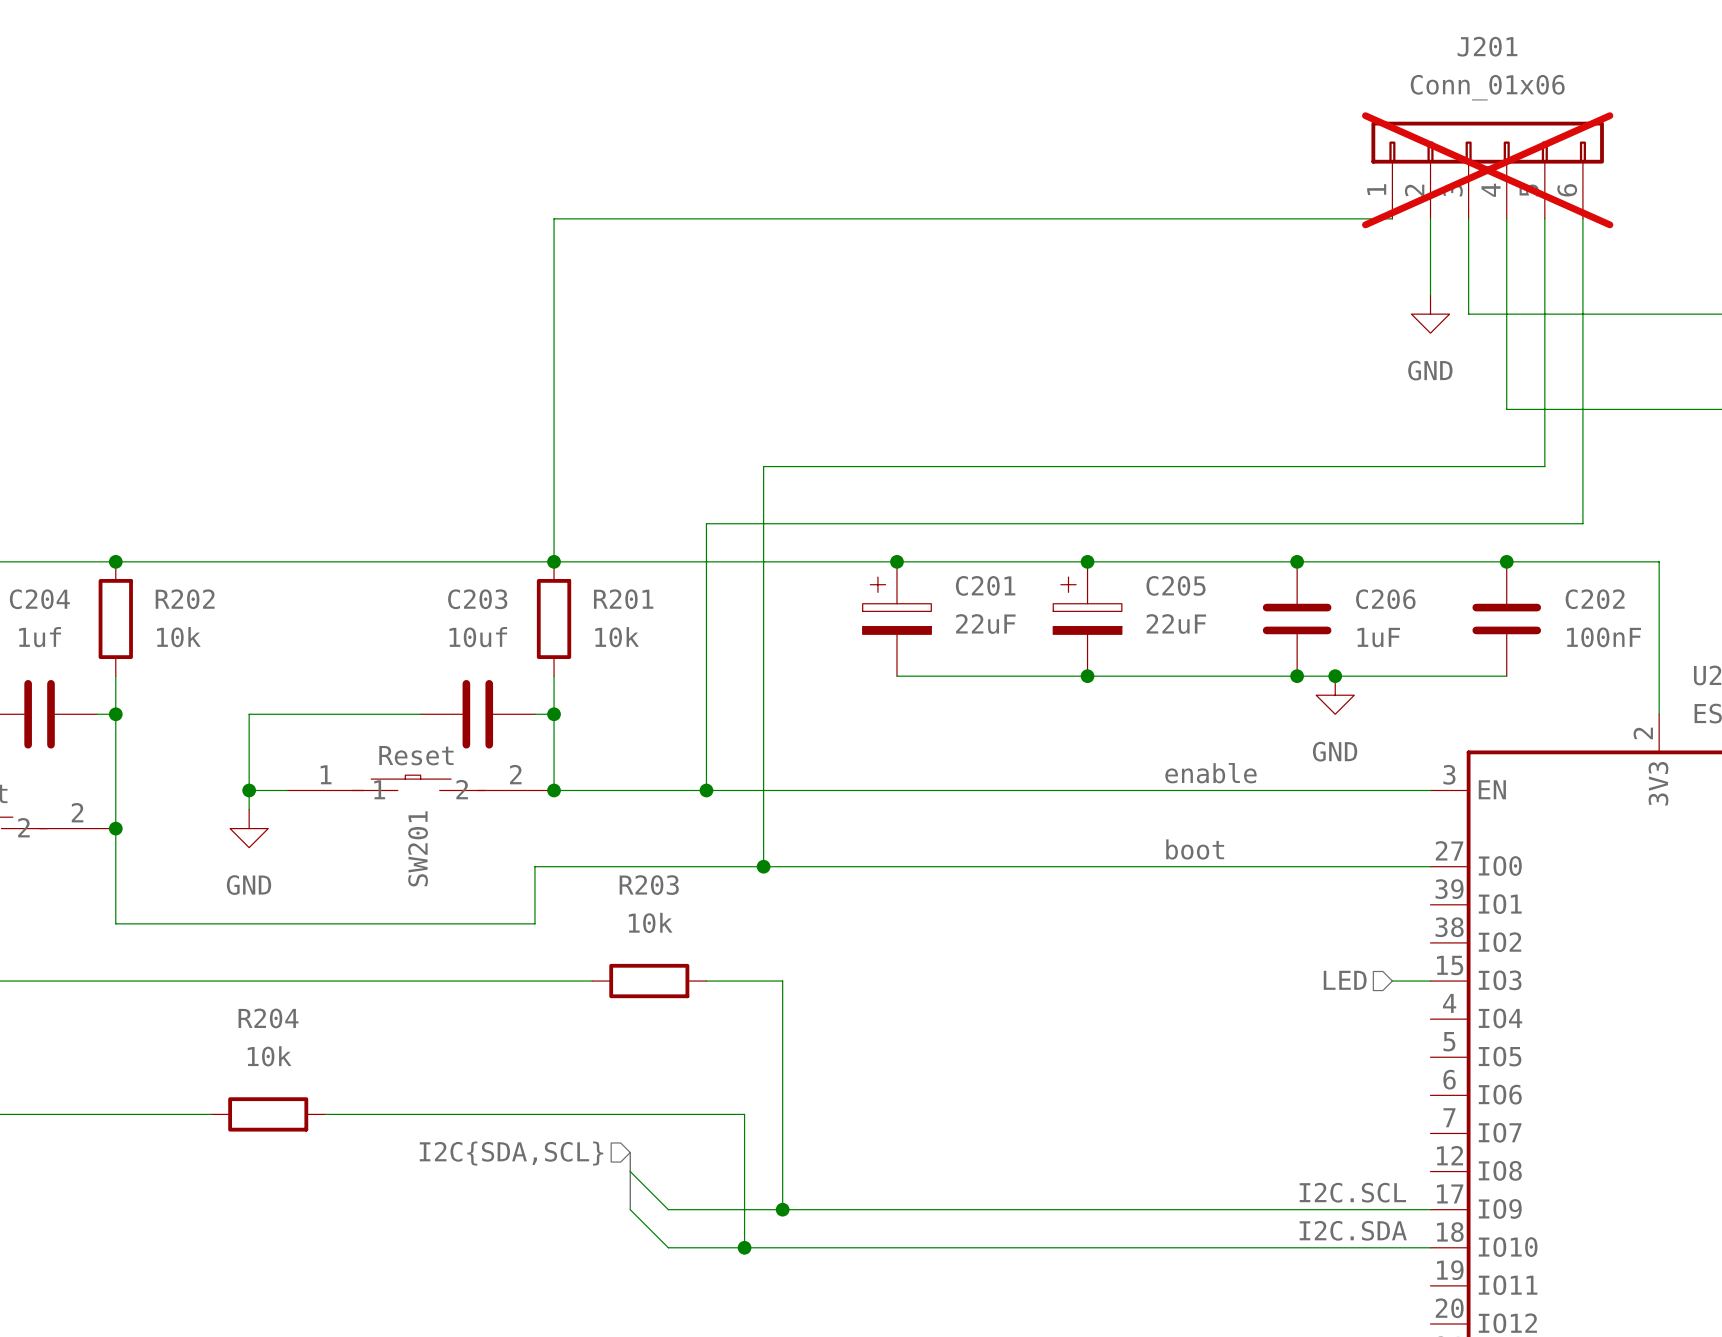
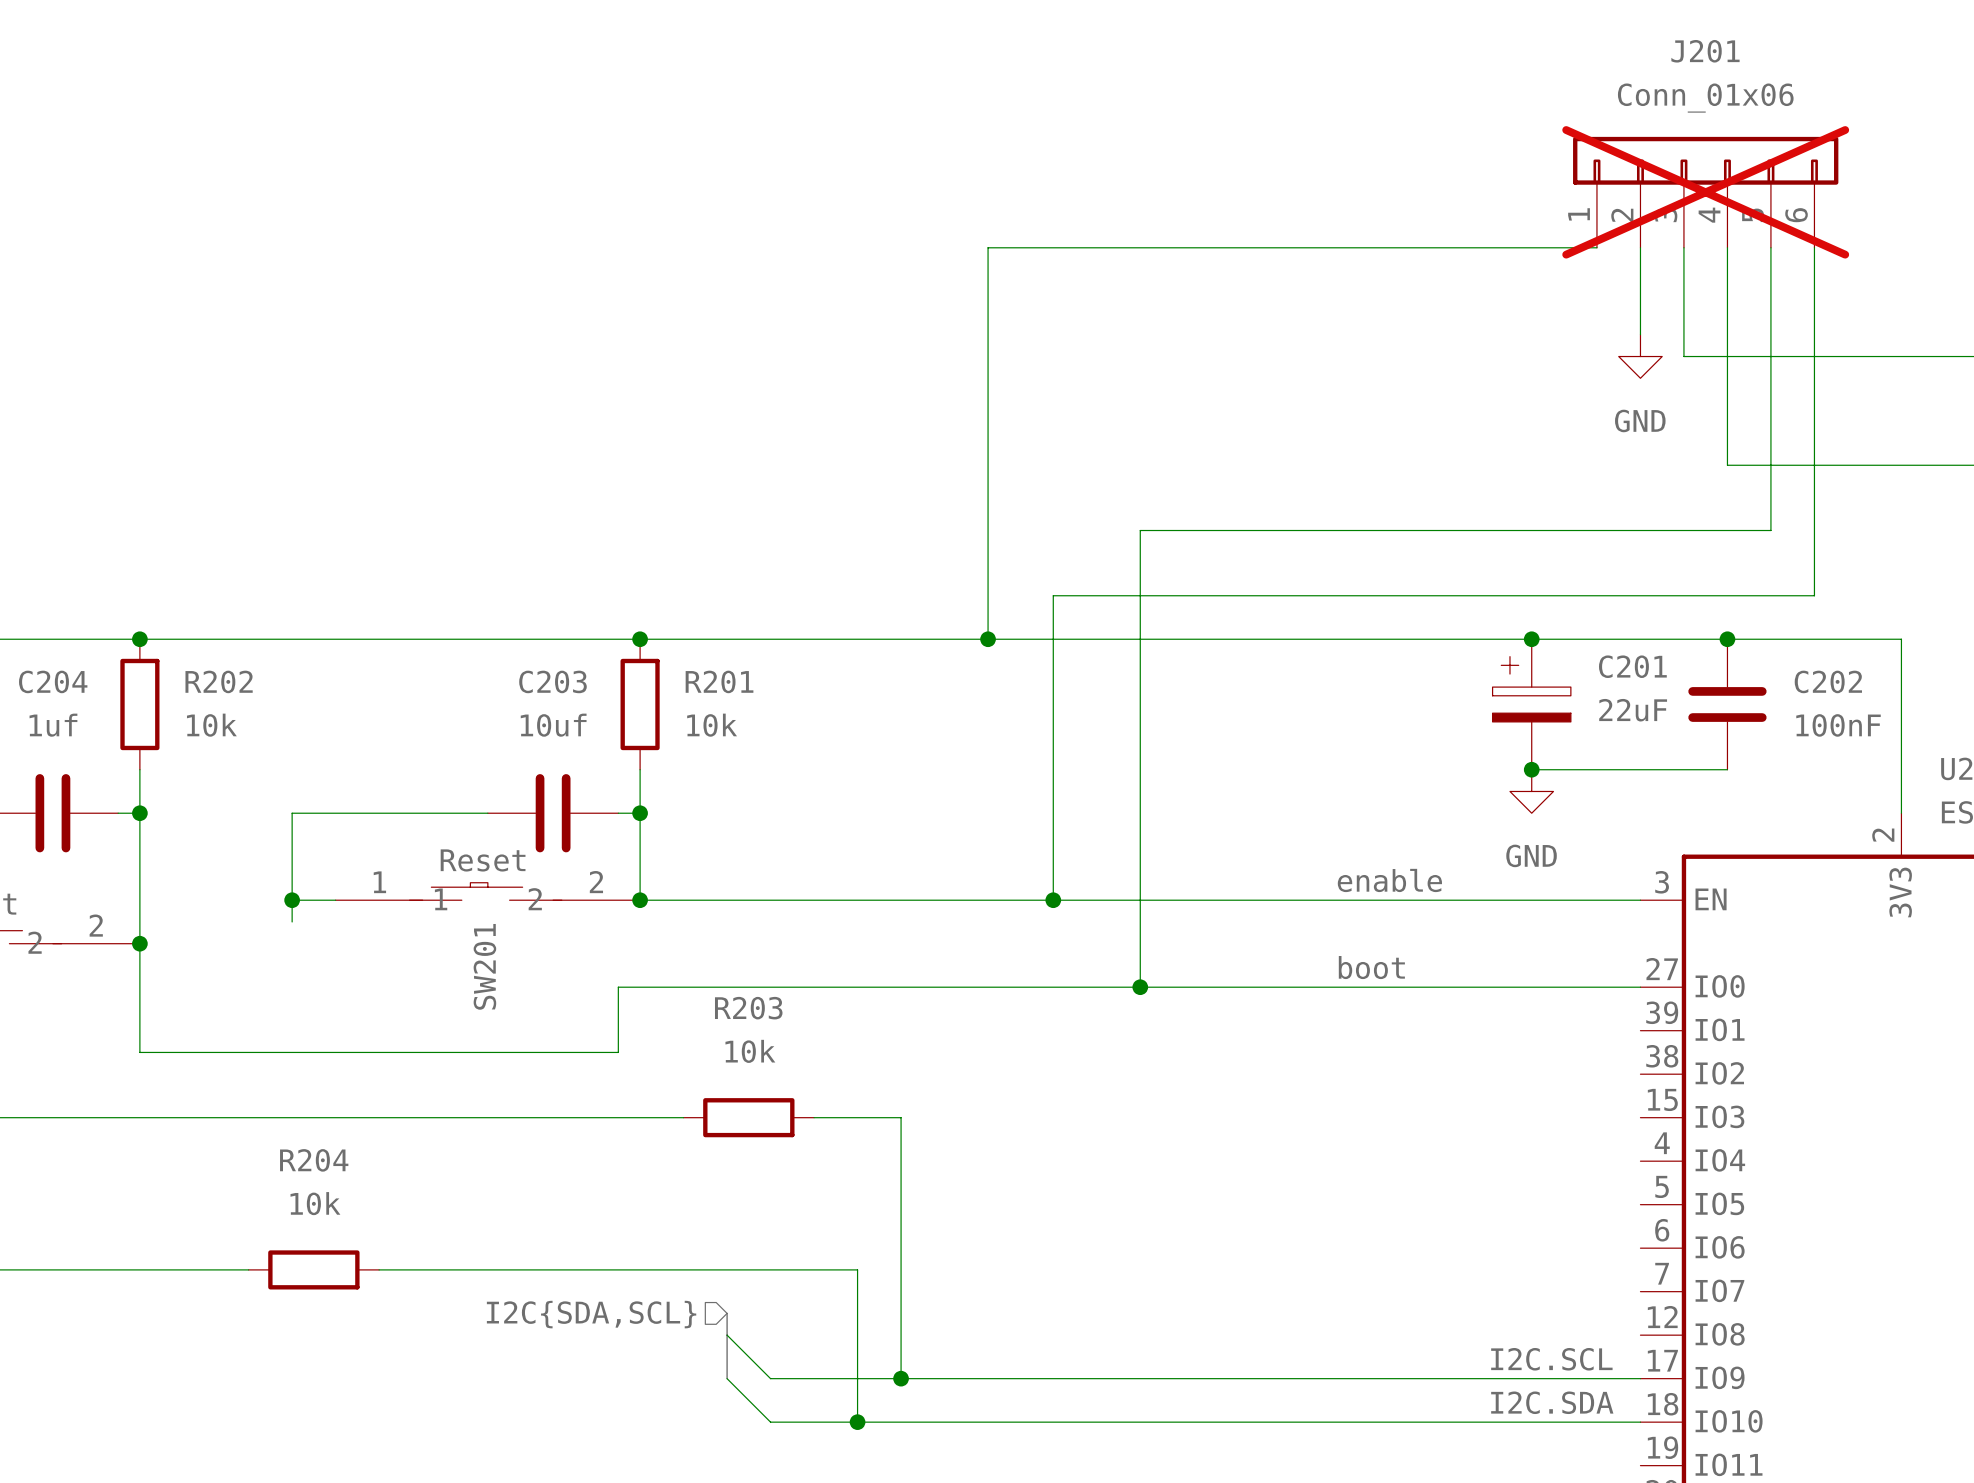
wire: (858, 218) (554, 218) (554, 561) -> (988, 247) (988, 639)
wire: (992, 466) (763, 466) (763, 866) -> (1140, 530) (1140, 987)
wire: (916, 523) (706, 523) (706, 790) -> (1053, 595) (1053, 900)
junction position: (897, 561) -> (988, 639)
junction: (1087, 561) -> none
junction position: (1297, 561) -> (1531, 639)
C201 position: (897, 619) -> (1531, 704)
C205: 22uF (1087, 619) -> none
C206: 1uF (1297, 619) -> none
wire: (897, 676) (1335, 676) -> none
junction: (1087, 676) -> none
junction: (1297, 676) -> none
junction: (706, 790) -> none
junction: none -> (1053, 900)
power symbol: GND (249, 828) -> none
junction: (763, 866) -> none
junction: none -> (1140, 987)
hierarchical label: LED (1345, 980) -> none
wire: (1392, 981) (1430, 981) -> none

